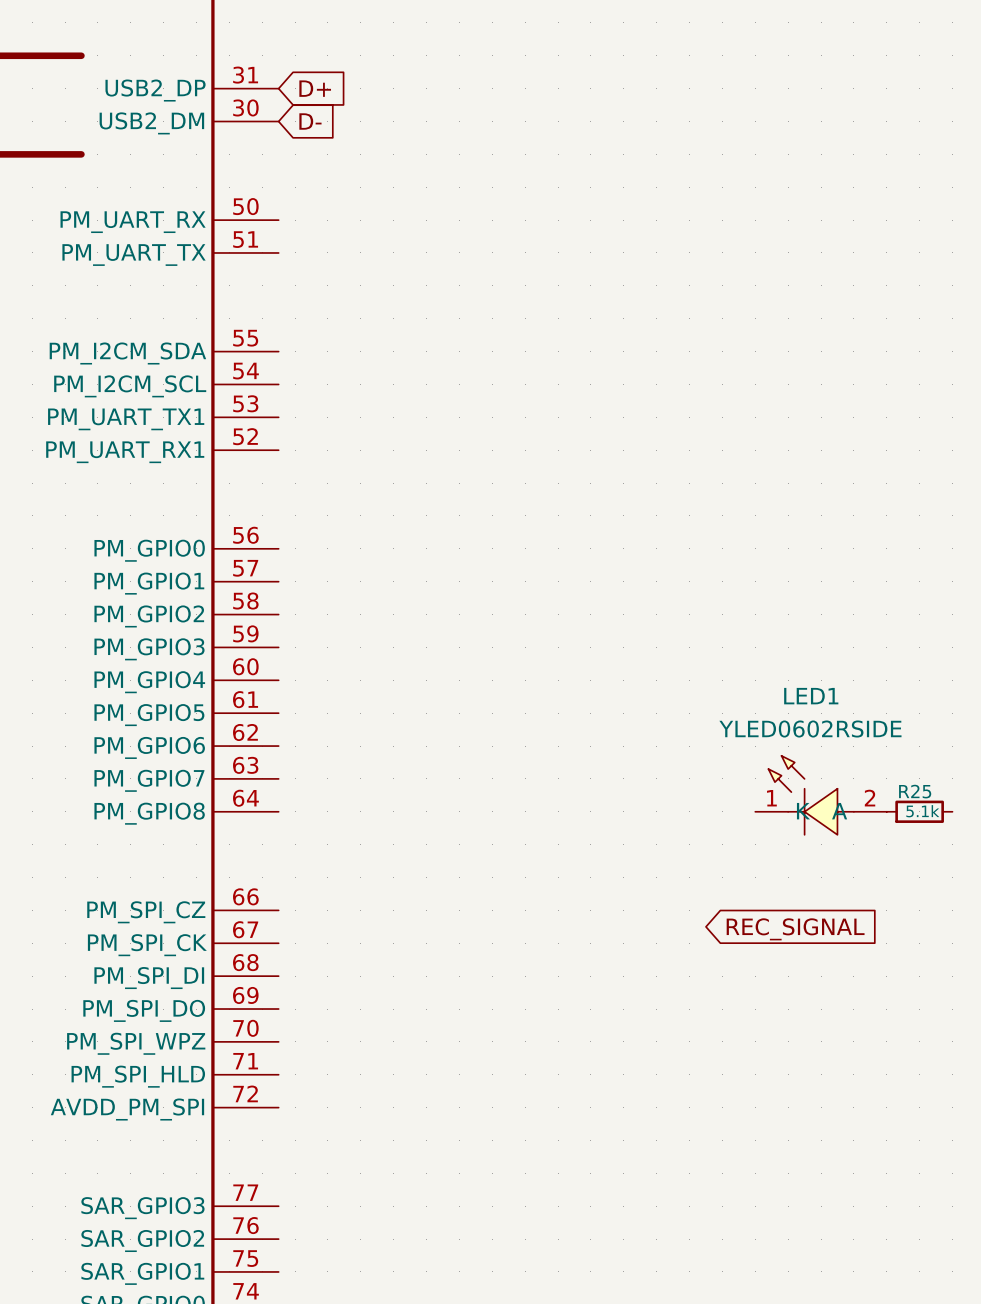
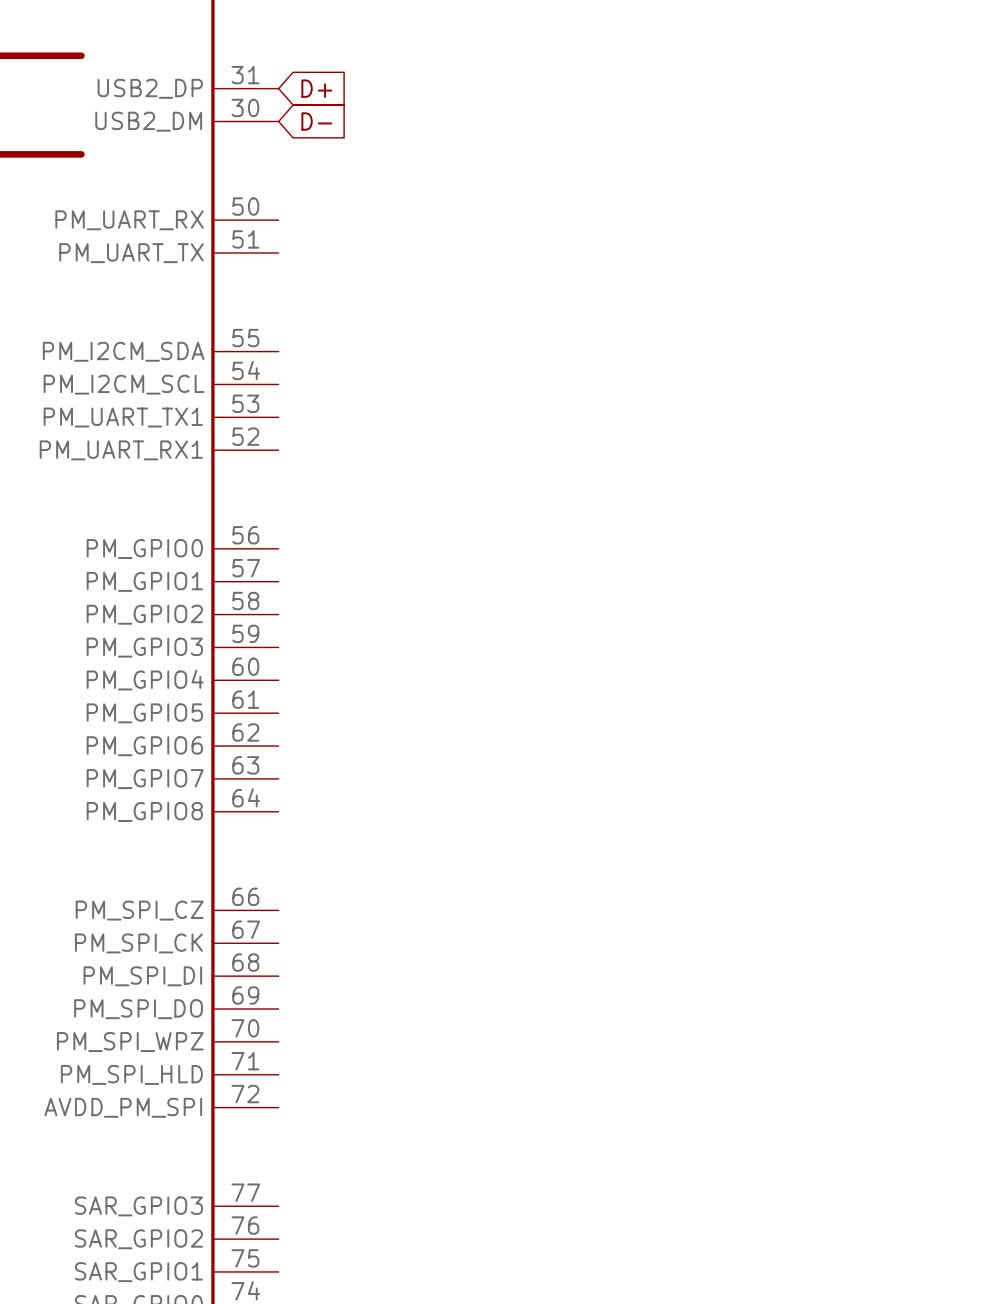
LED1: YLED0602RSIDE (821, 795) -> none
R25: 5.1k (919, 811) -> none
global label: REC_SIGNAL (795, 929) -> none

